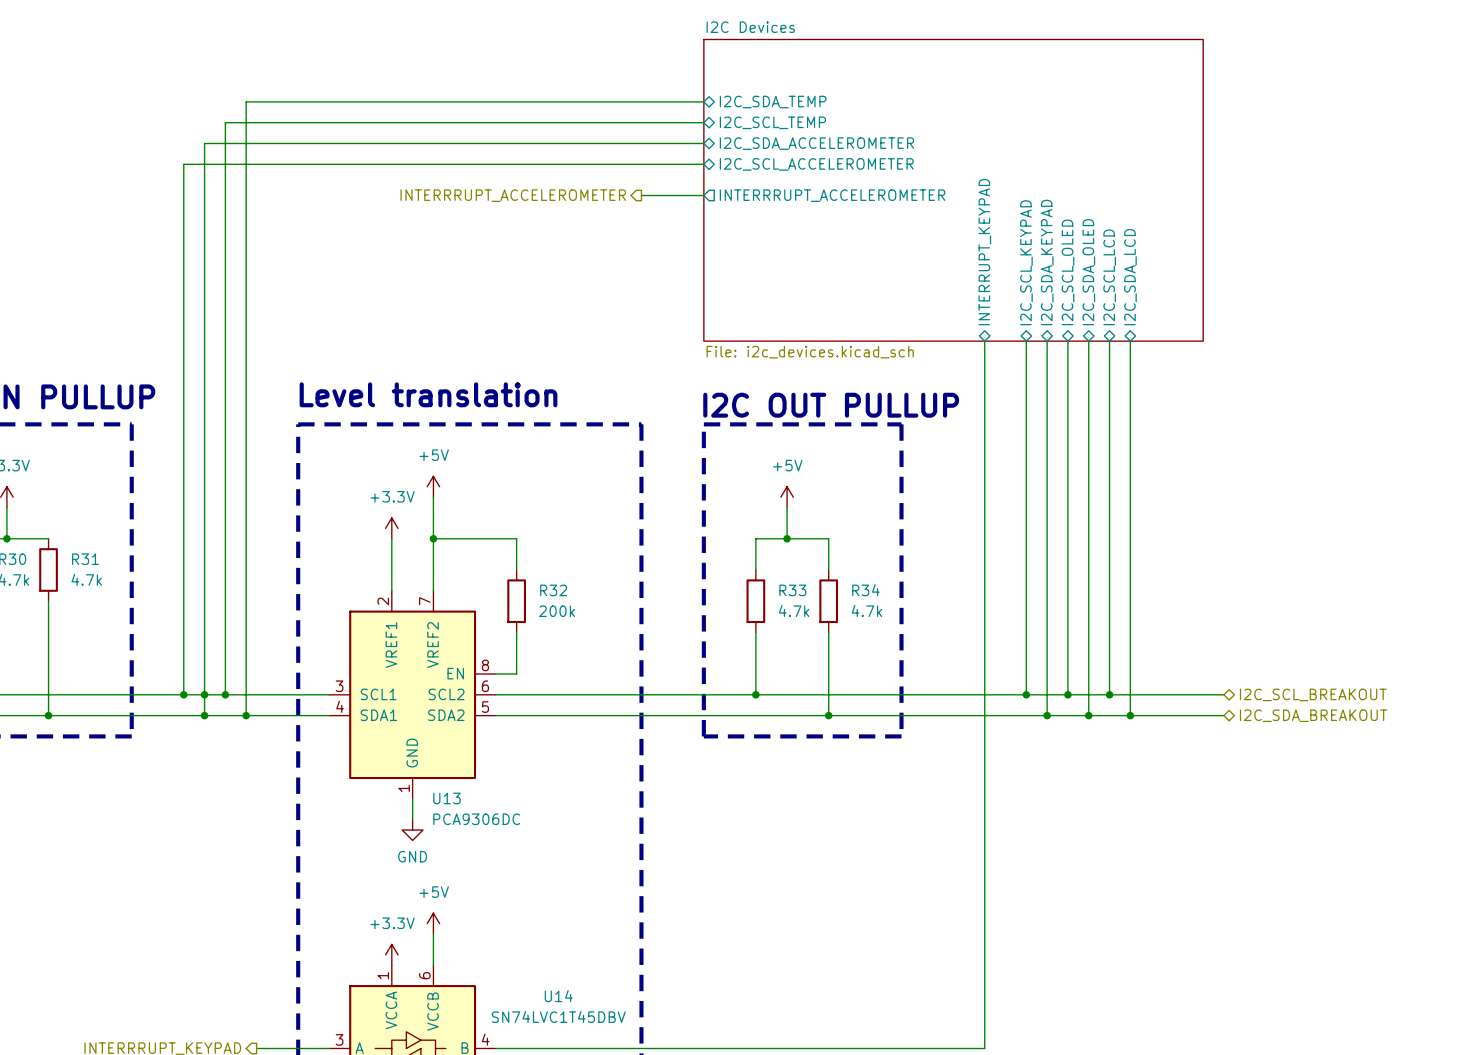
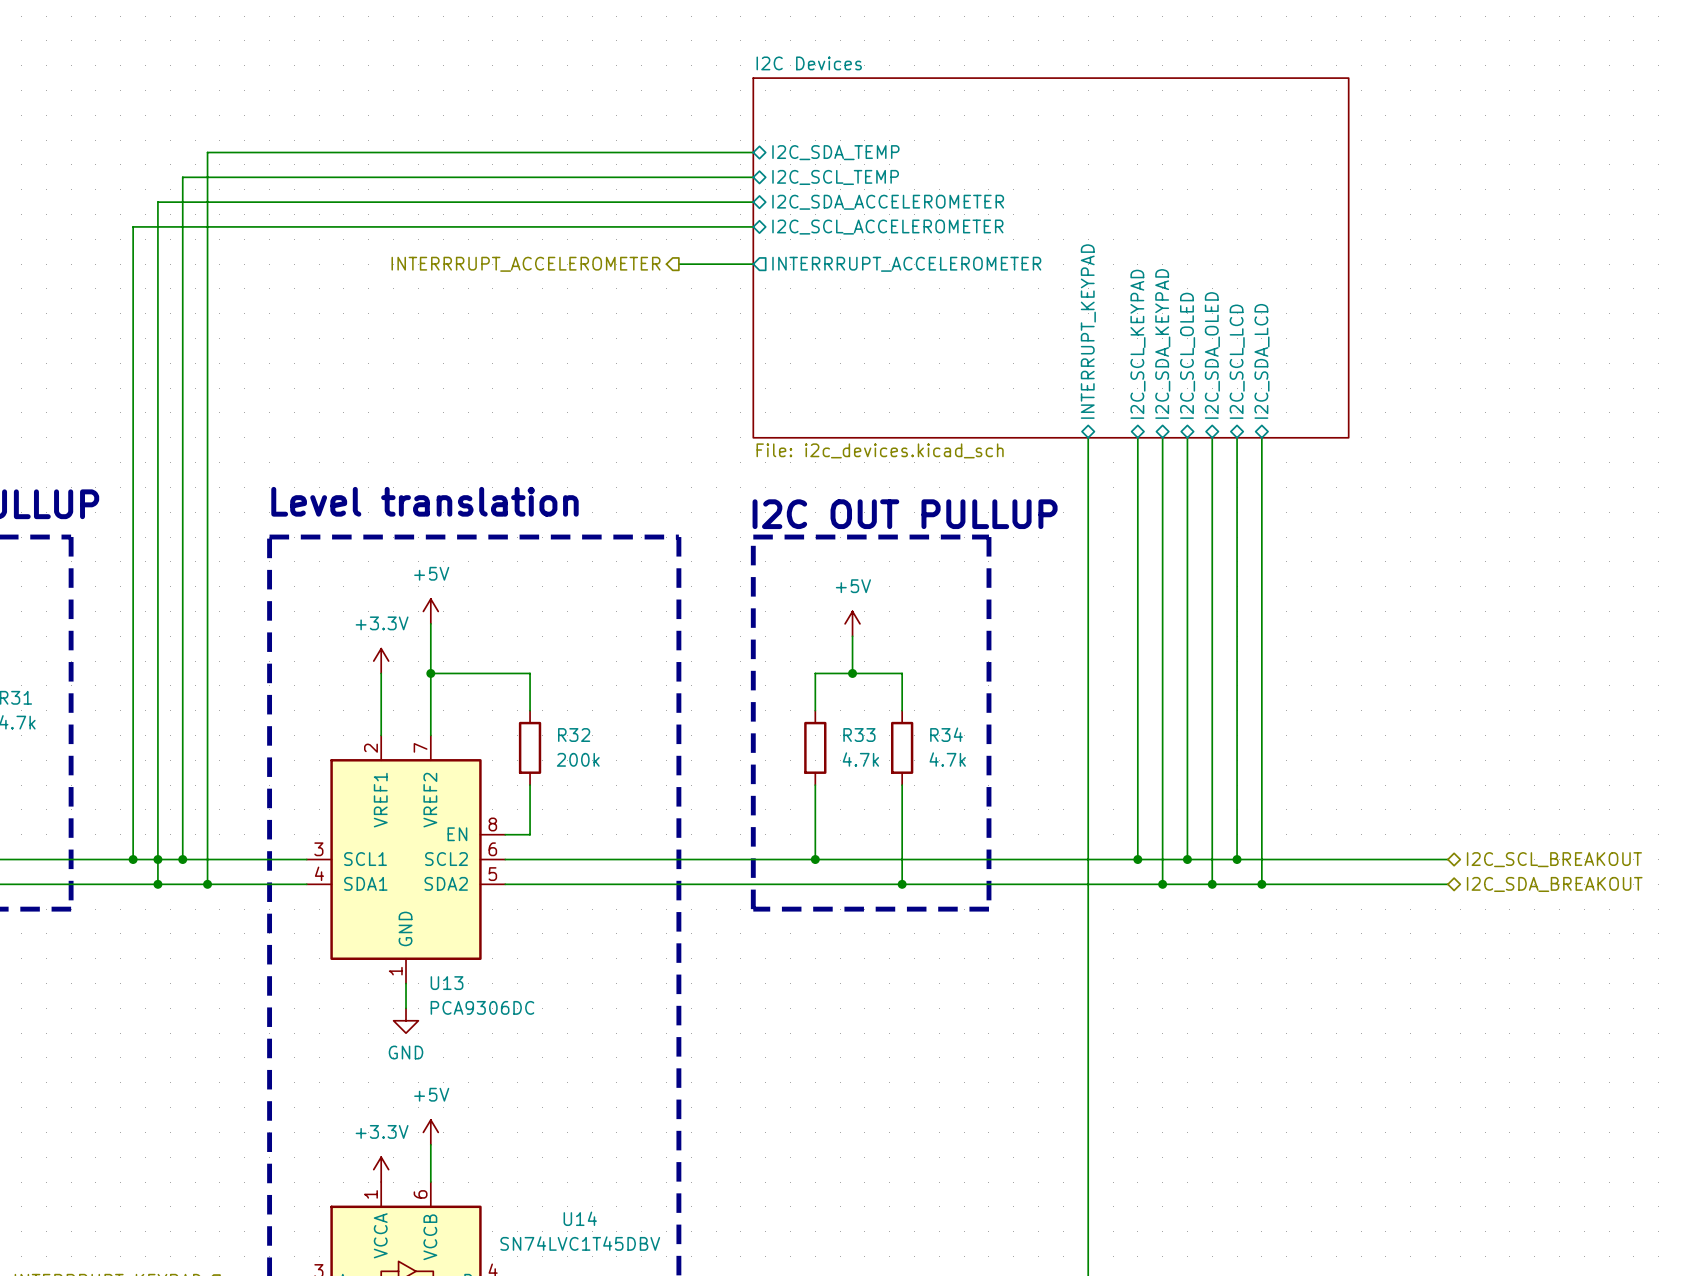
wire: none -> (1373, 859) (1447, 859)
hierarchical label position: I2C_SCL_BREAKOUT (1313, 694) -> I2C_SCL_BREAKOUT (1554, 859)
wire: none -> (1373, 884) (1447, 884)
hierarchical label position: I2C_SDA_BREAKOUT (1313, 715) -> I2C_SDA_BREAKOUT (1554, 884)

